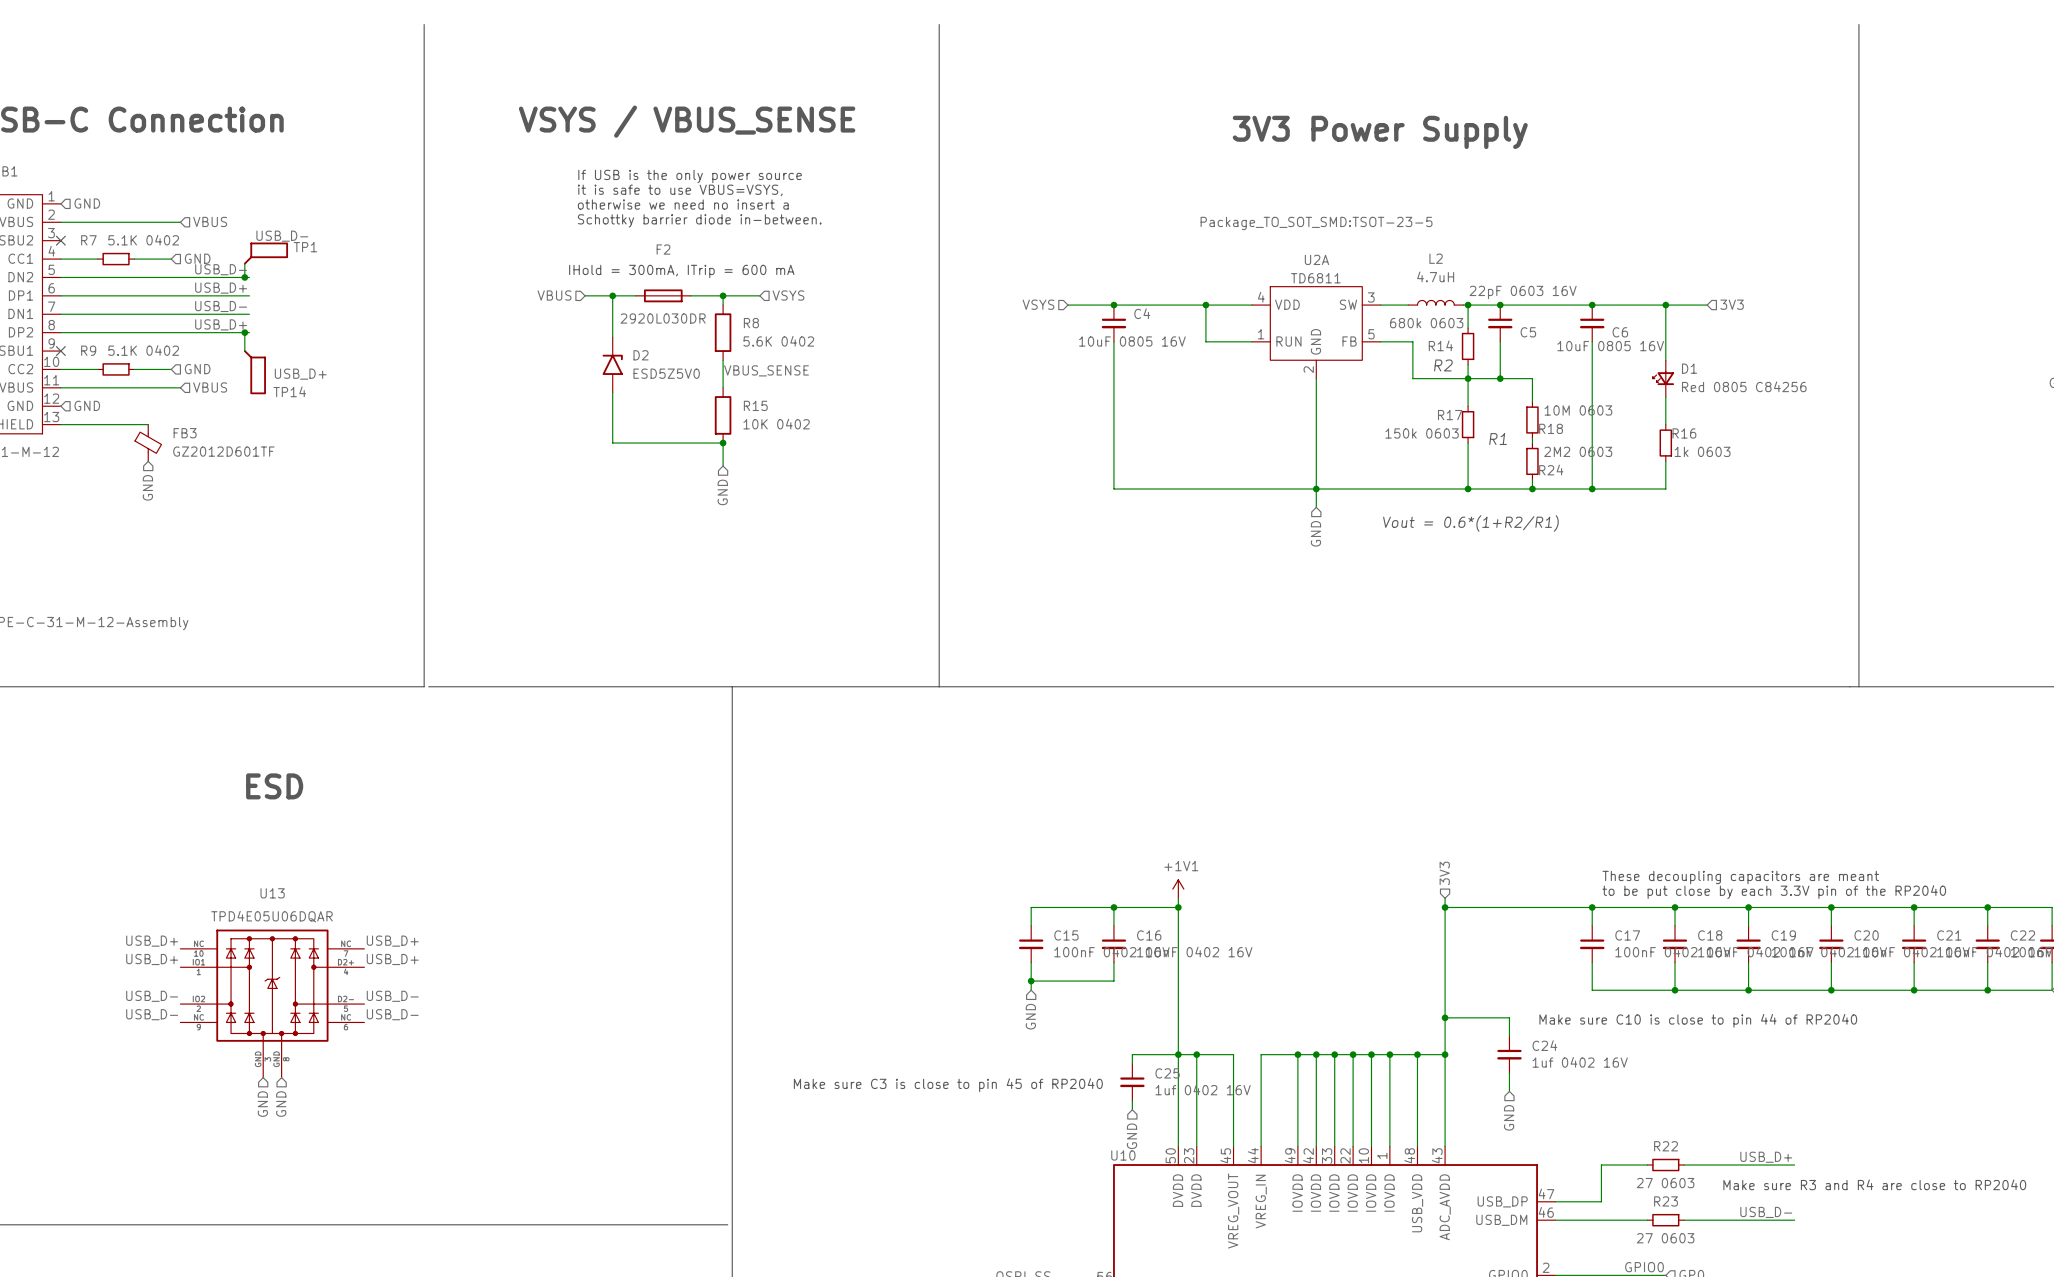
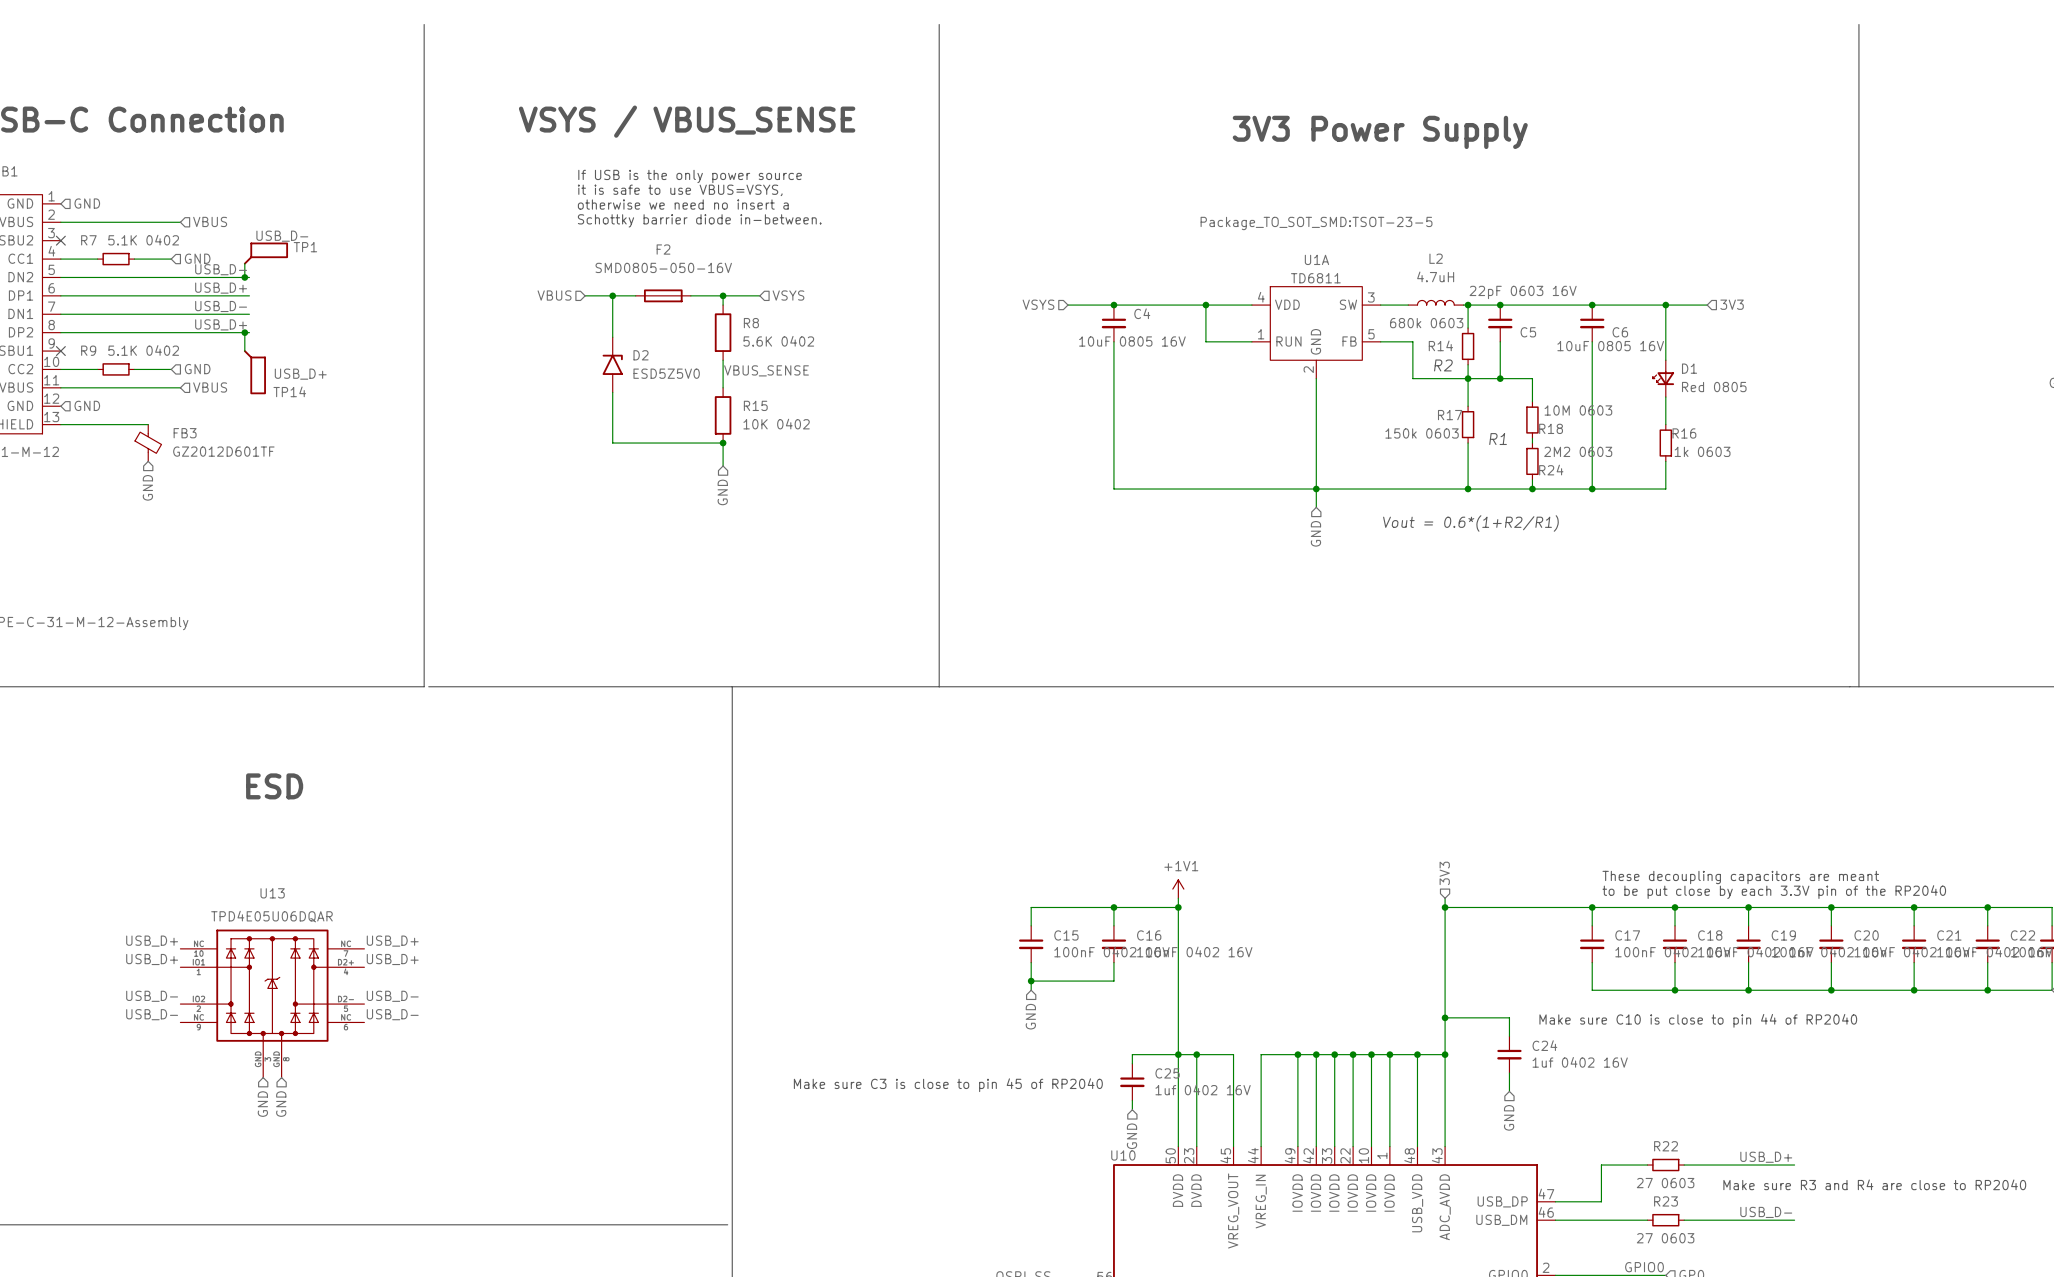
U2A name: U2A (1316, 259) -> U1A (1316, 259)
text: IHold = 300mA, ITrip = 600 mA (681, 271) -> none
F2 value: 2920L030DR (663, 318) -> SMD0805-050-16V (663, 267)
D1 value: Red 0805 C84256 (1744, 386) -> Red 0805 (1714, 387)

